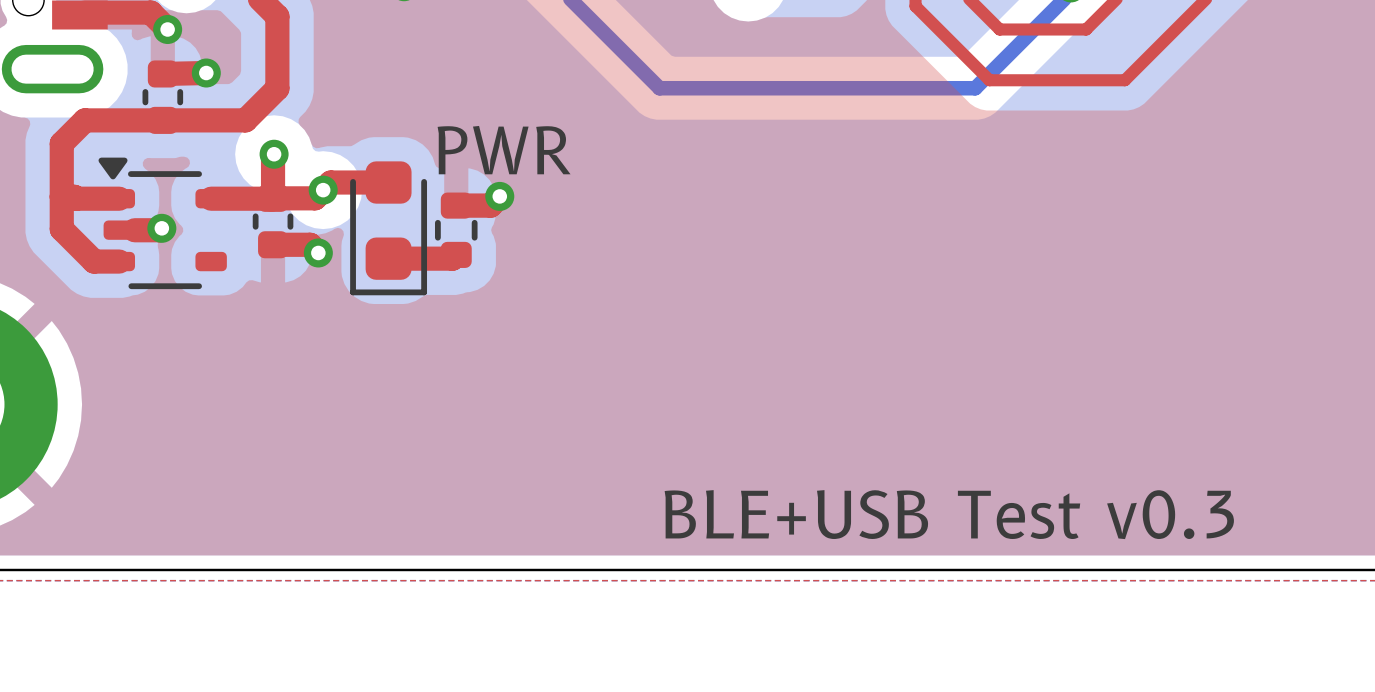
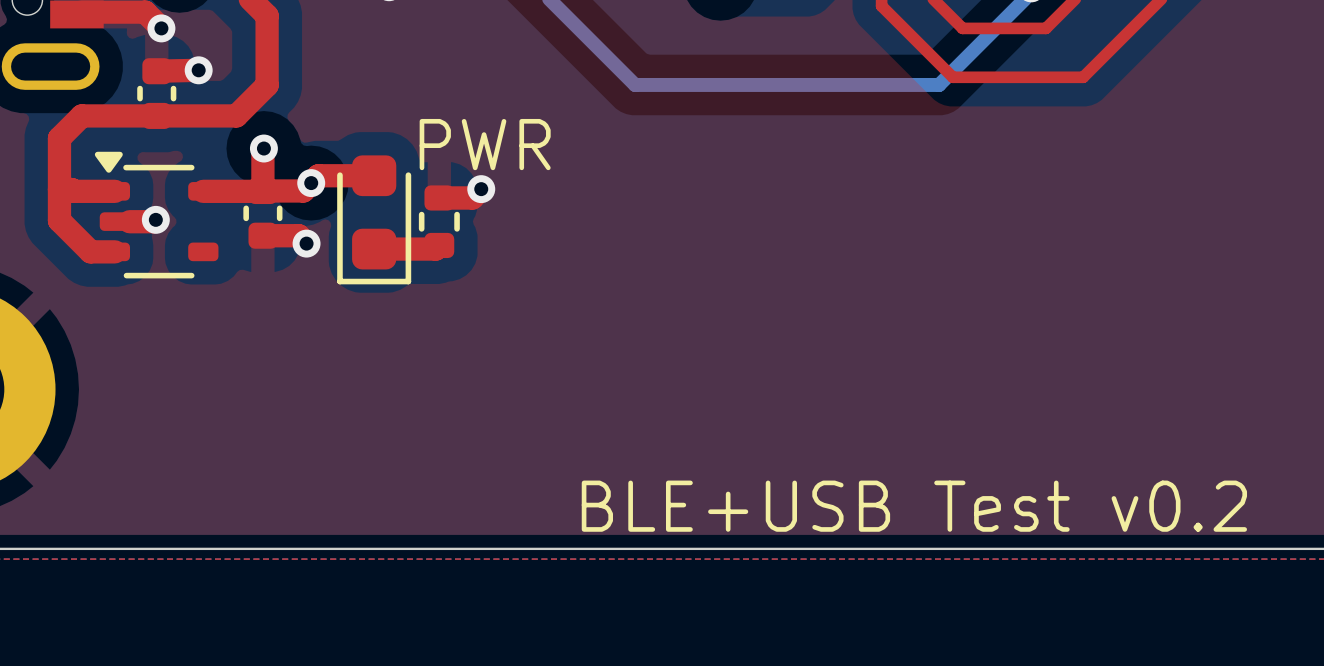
text: BLE+USB Test v0.3 (949, 514) -> BLE+USB Test v0.2 (914, 506)

